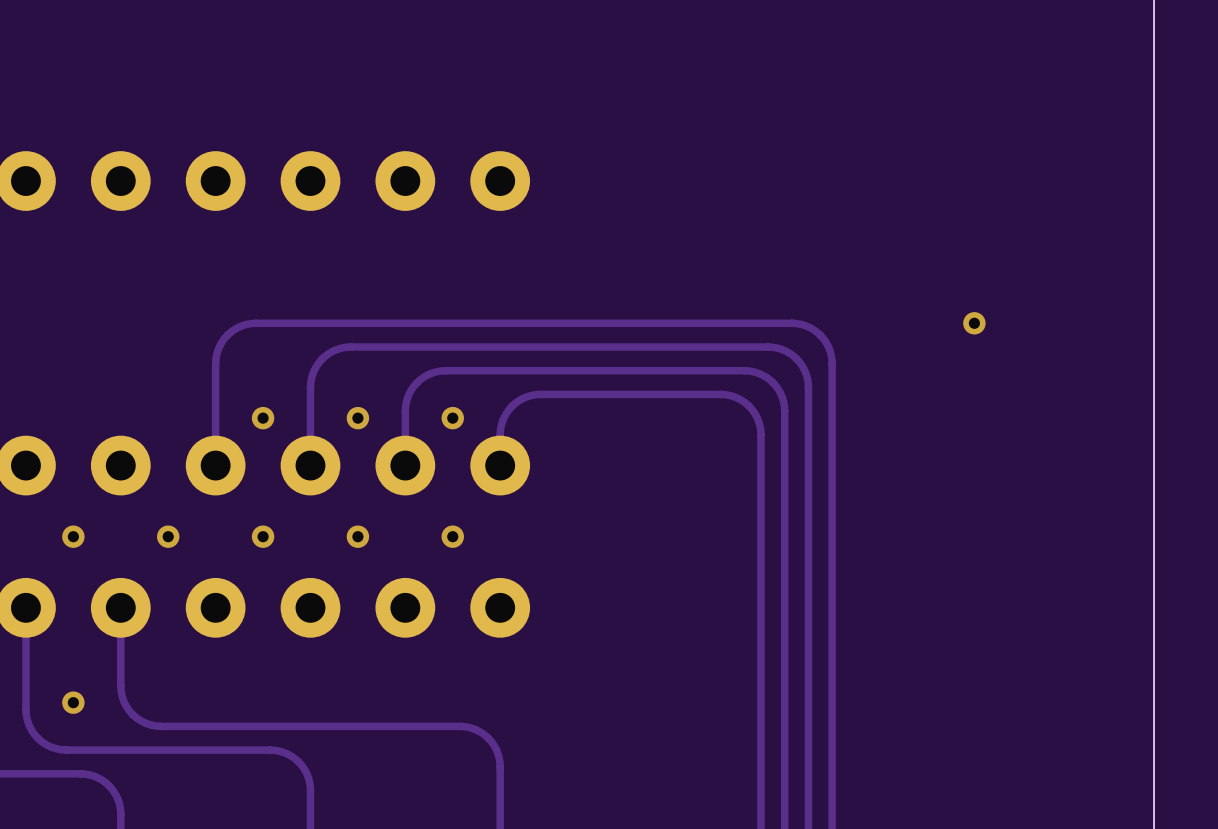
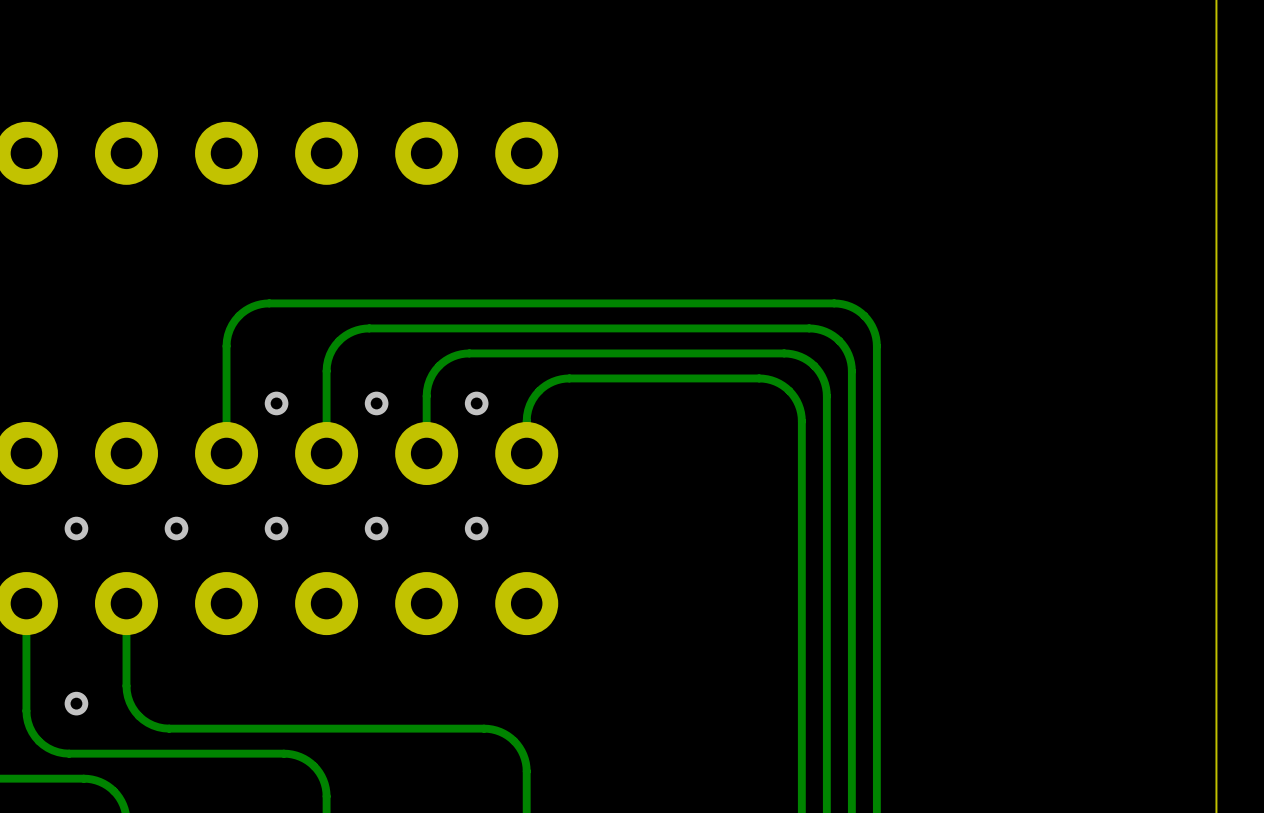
via: (974, 323) -> none

